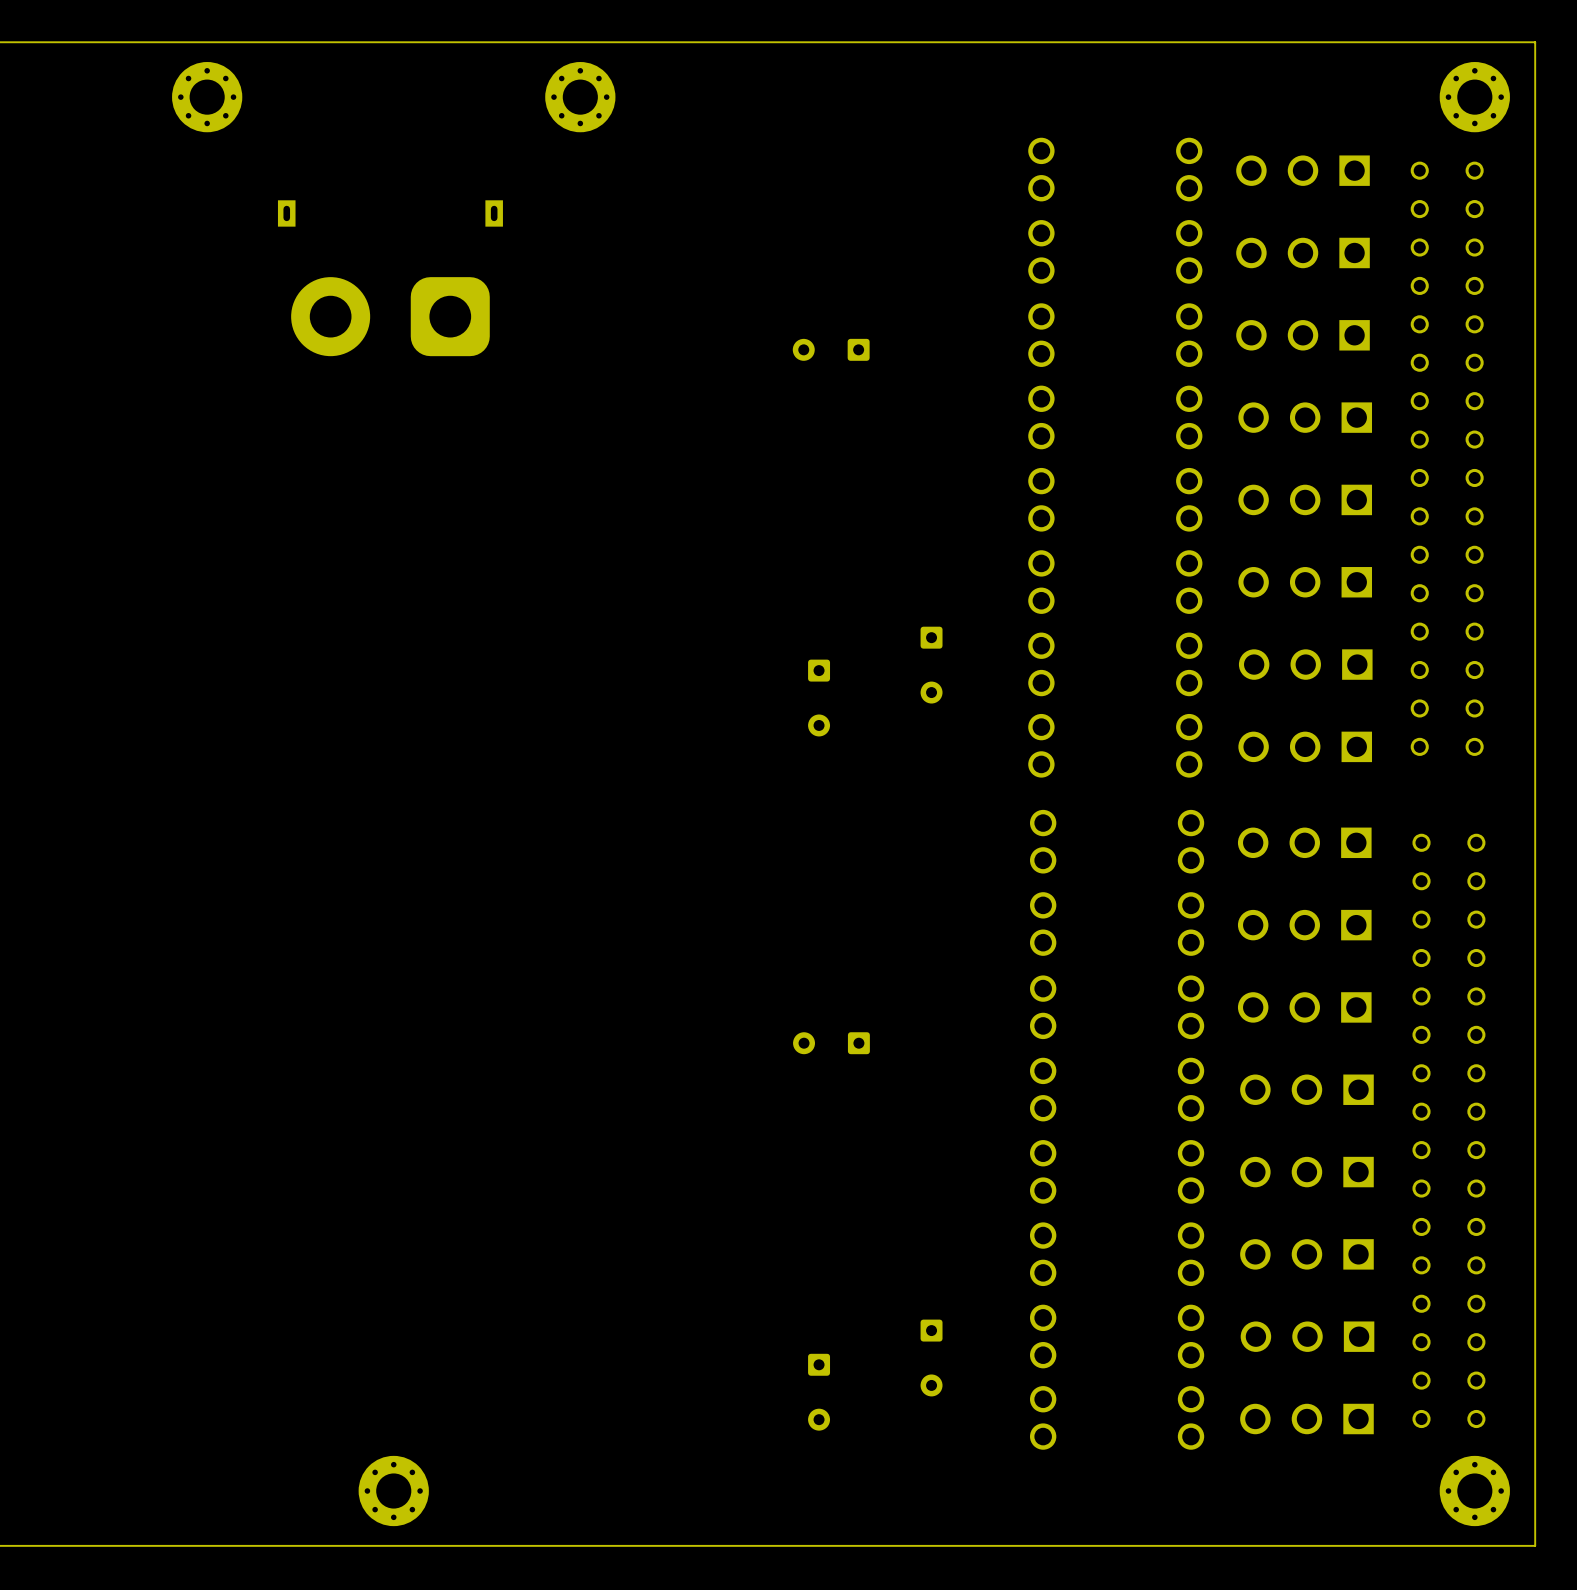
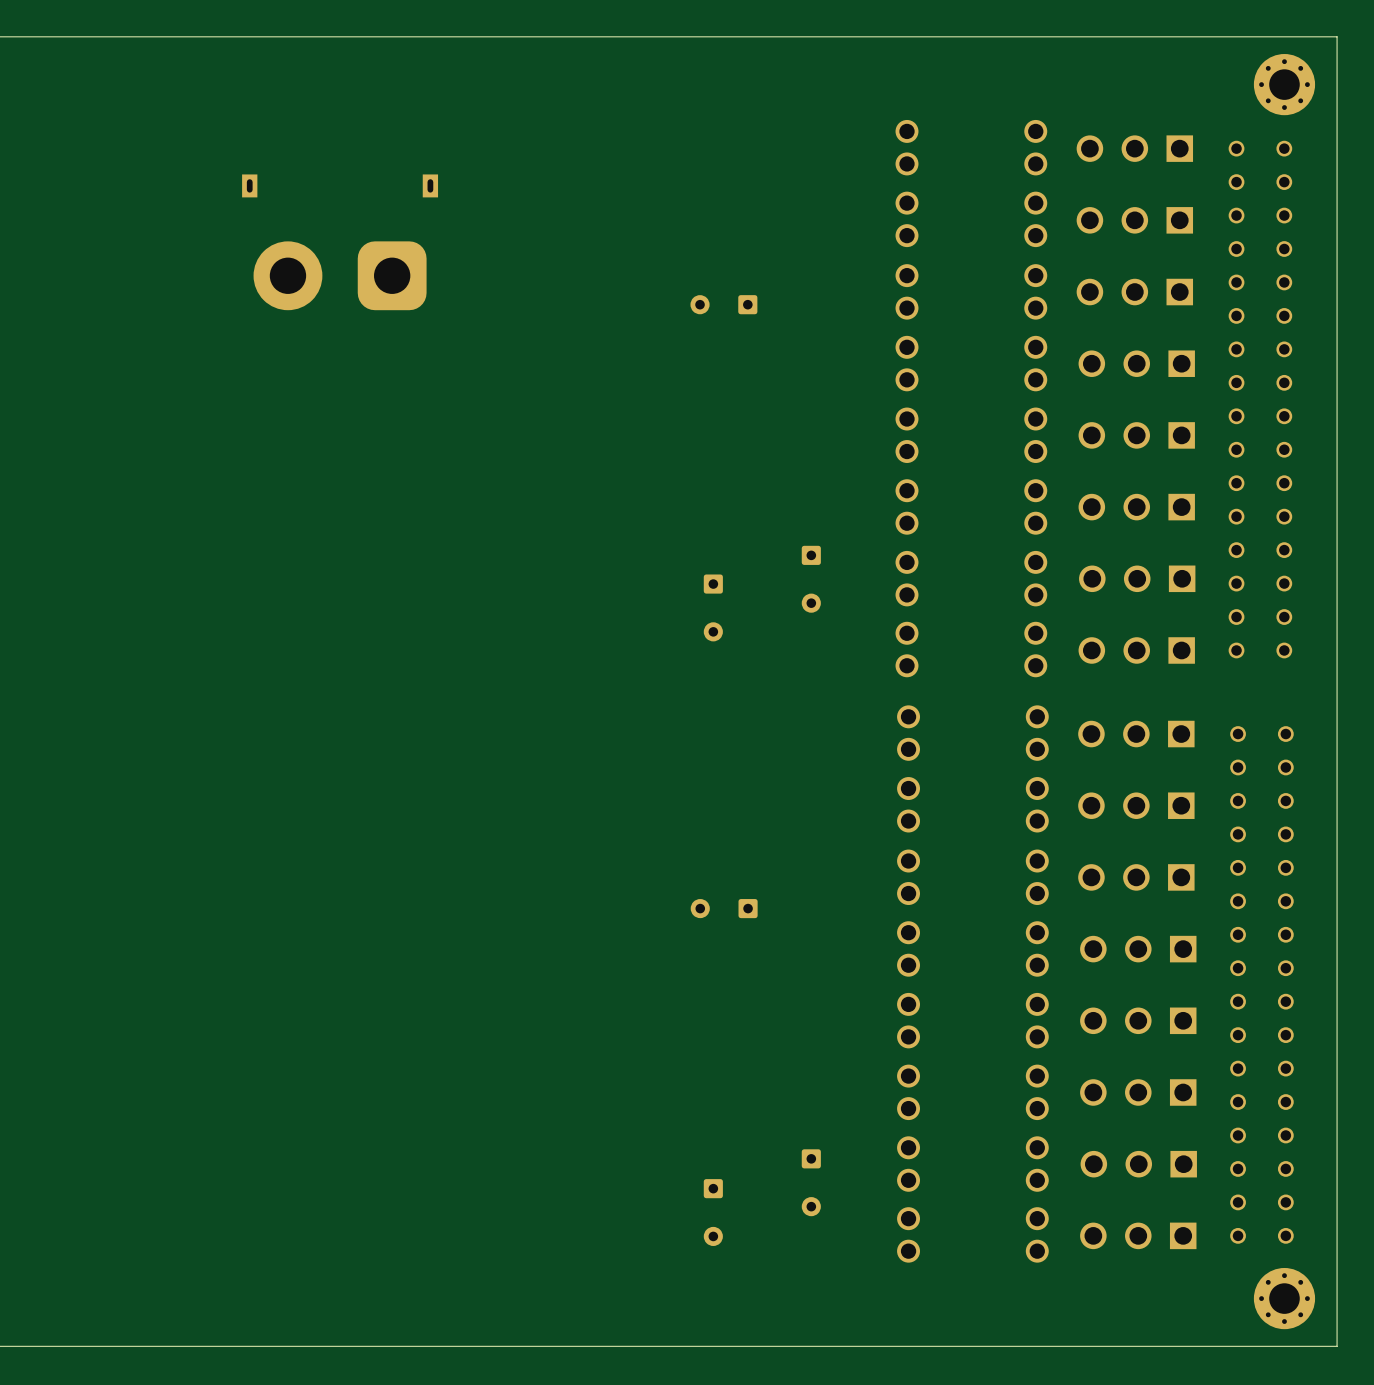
part: (207, 97) -> none
part: (580, 97) -> none
part: (393, 1491) -> none

